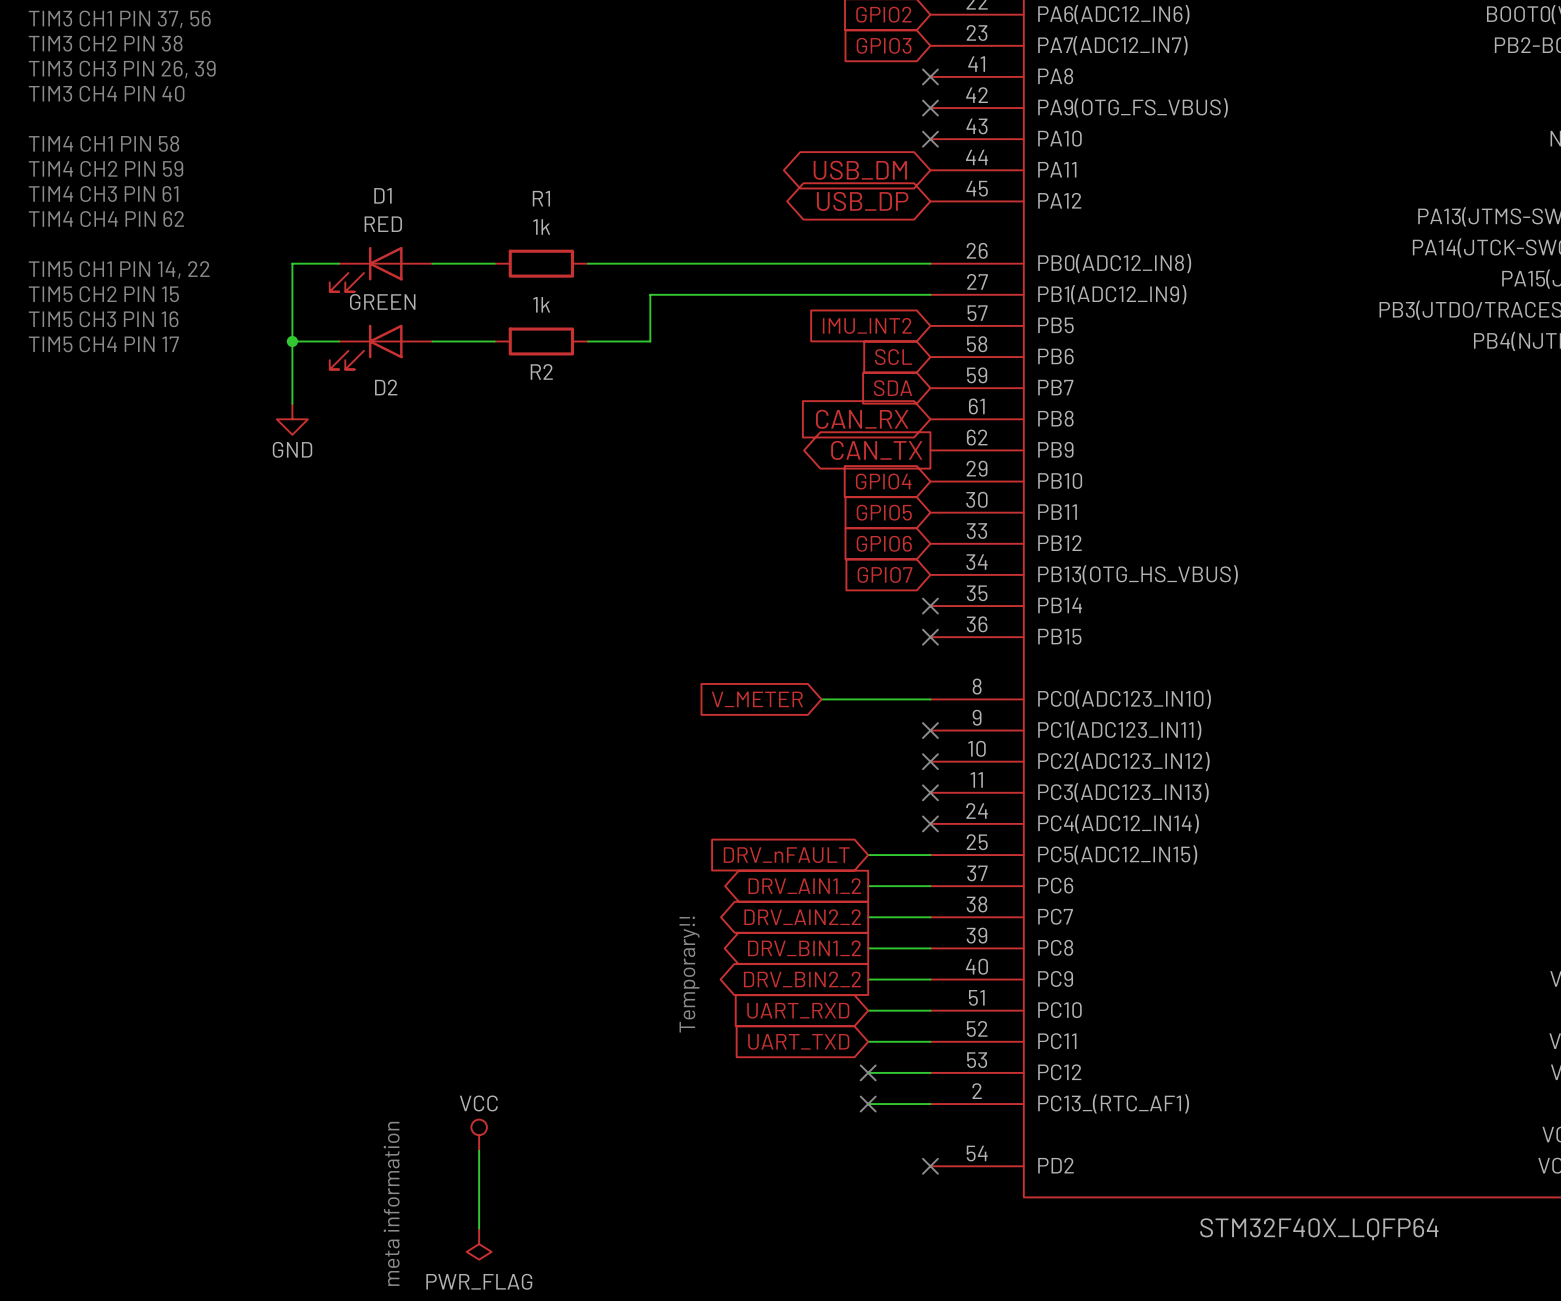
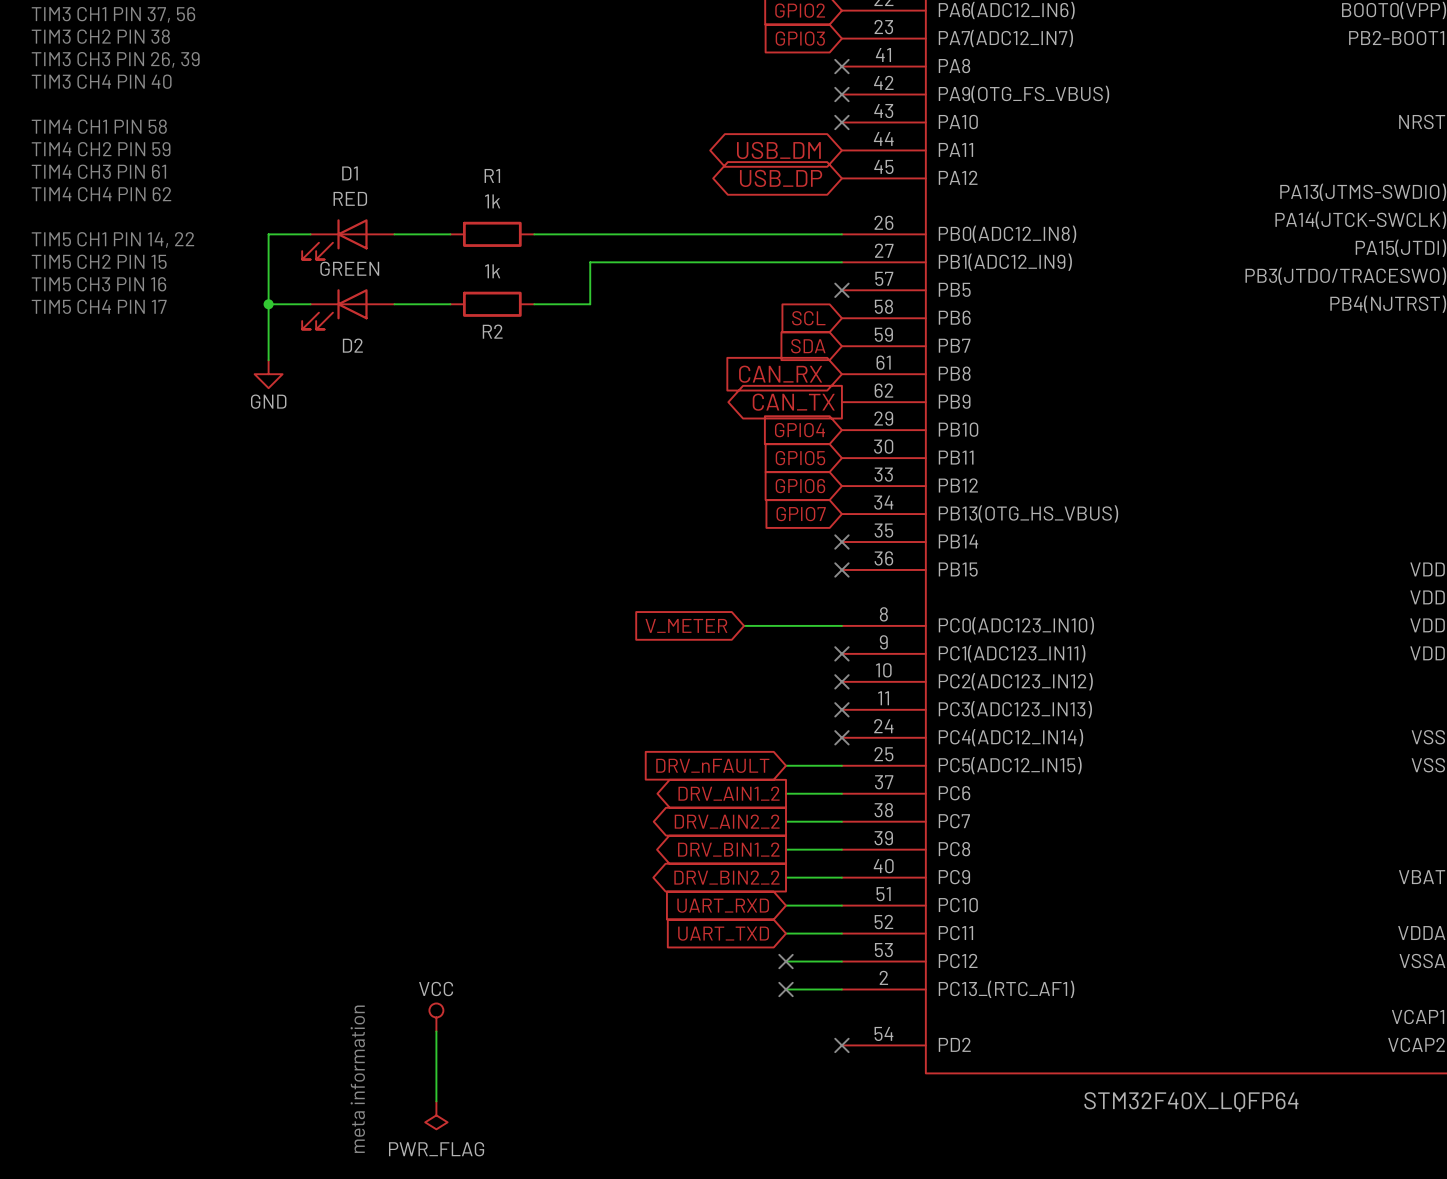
global label: IMU_INT2 (867, 325) -> none
no-connect mark: none -> (841, 290)
text: Temporary!! (689, 974) -> none

